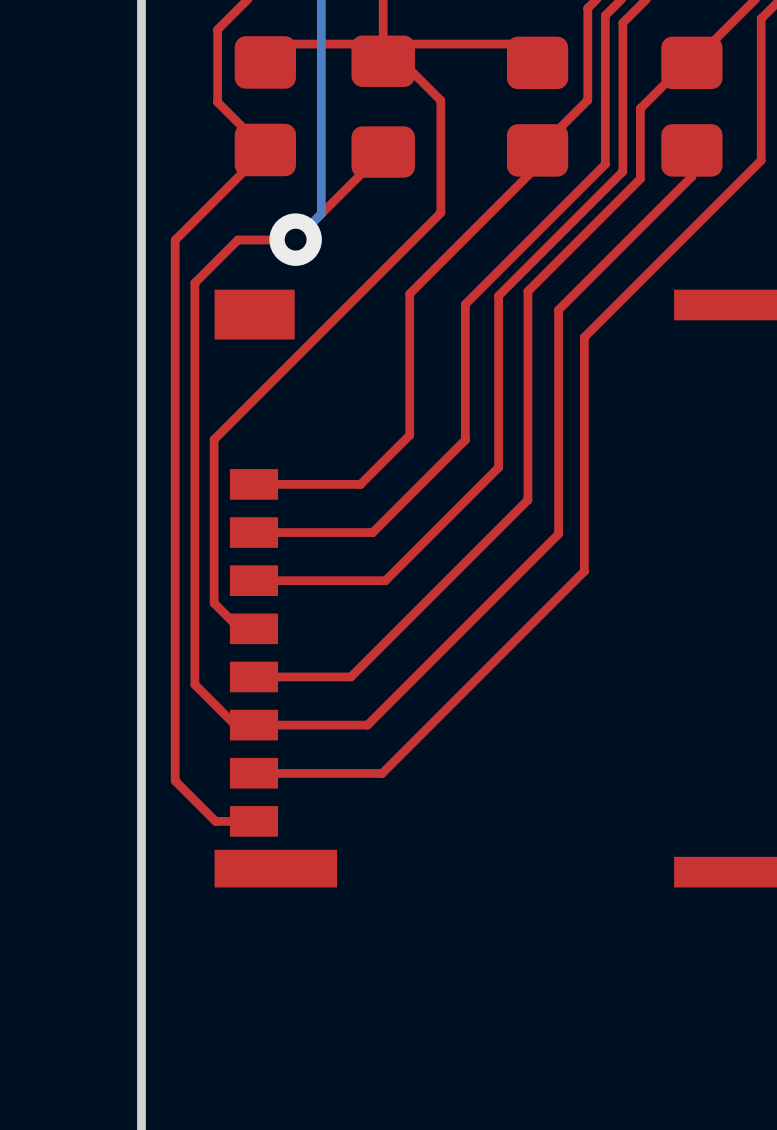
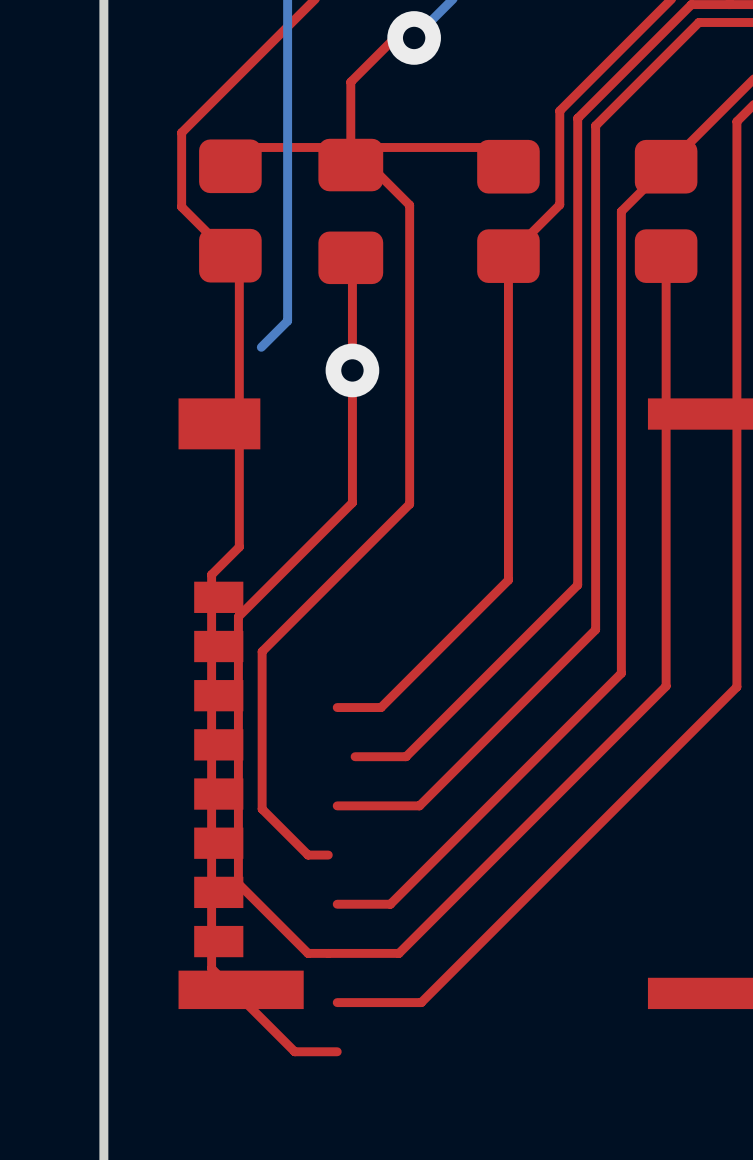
top track: (691, 62) (686, 62) (640, 108) (640, 178) (527, 291) (527, 499) (350, 676) (253, 676) -> (666, 166) (621, 211) (621, 673) (390, 904) (337, 904)
top track: (265, 149) (175, 240) (175, 780) (215, 821) (253, 821) -> (230, 255) (239, 264) (239, 547) (211, 574) (211, 968) (294, 1051) (337, 1051)
top track: (383, 152) (295, 239) (237, 239) (194, 283) (194, 684) (235, 725) (367, 725) (558, 534) (558, 310) (691, 176) -> (350, 257) (352, 259) (352, 502) (238, 616) (238, 883) (308, 953) (398, 953) (666, 686) (666, 282)
top track: (761, 160) (584, 337) (584, 571) (382, 773) (254, 773) -> (736, 266) (736, 686) (421, 1002) (337, 1002)
top track: (605, 164) (465, 304) (465, 439) (372, 532) (253, 532) -> (577, 270) (577, 585) (406, 756) (355, 756)
top track: (537, 166) (409, 293) (409, 435) (360, 484) (253, 484) -> (508, 272) (508, 580) (381, 707) (337, 707)
top track: (622, 171) (498, 295) (498, 467) (385, 580) (253, 580) -> (595, 277) (595, 629) (419, 805) (337, 805)
top track: (440, 212) (214, 439) (214, 603) (239, 628) (253, 628) -> (409, 319) (409, 504) (262, 651) (262, 809) (308, 855) (328, 855)
via position: (295, 239) -> (352, 370)

